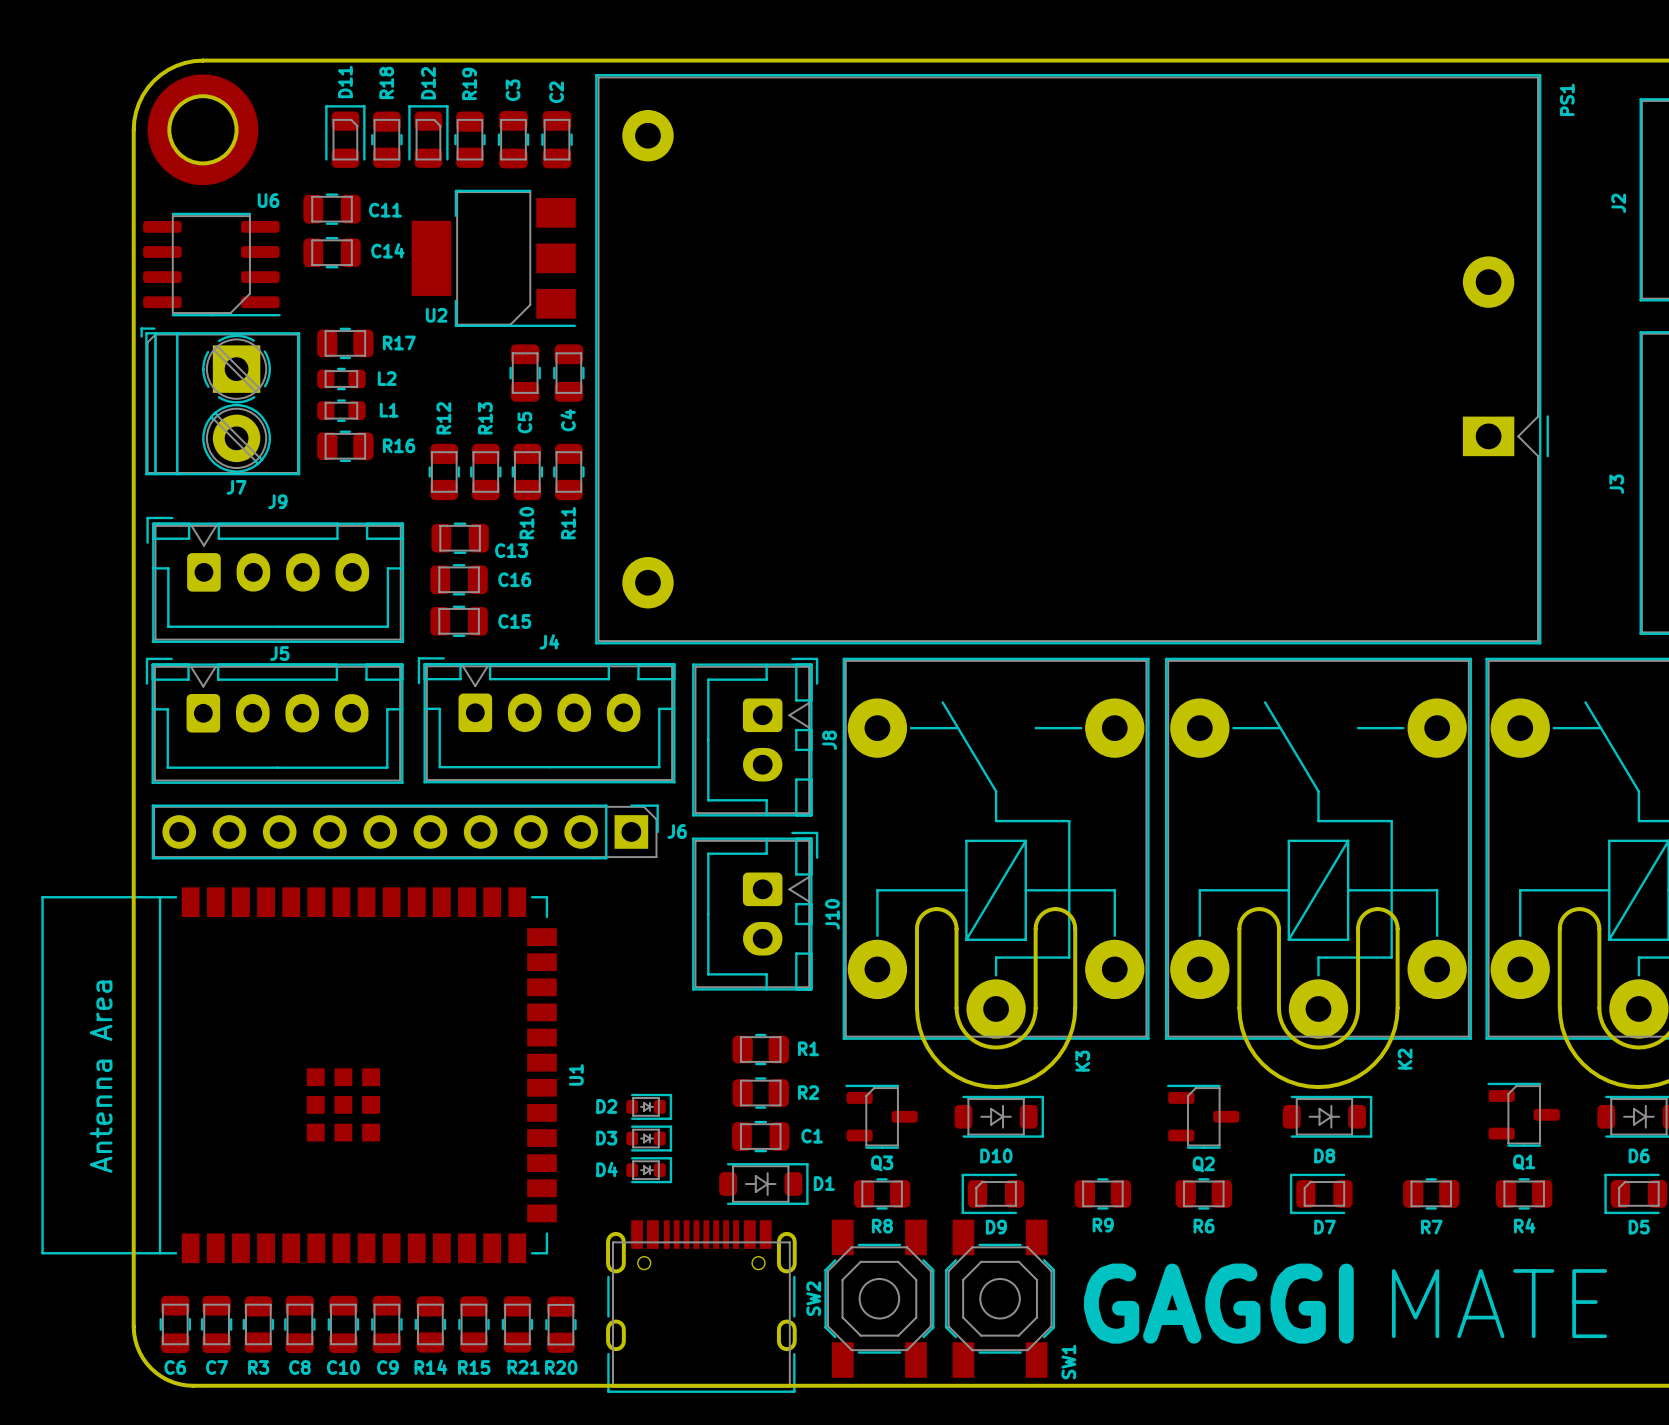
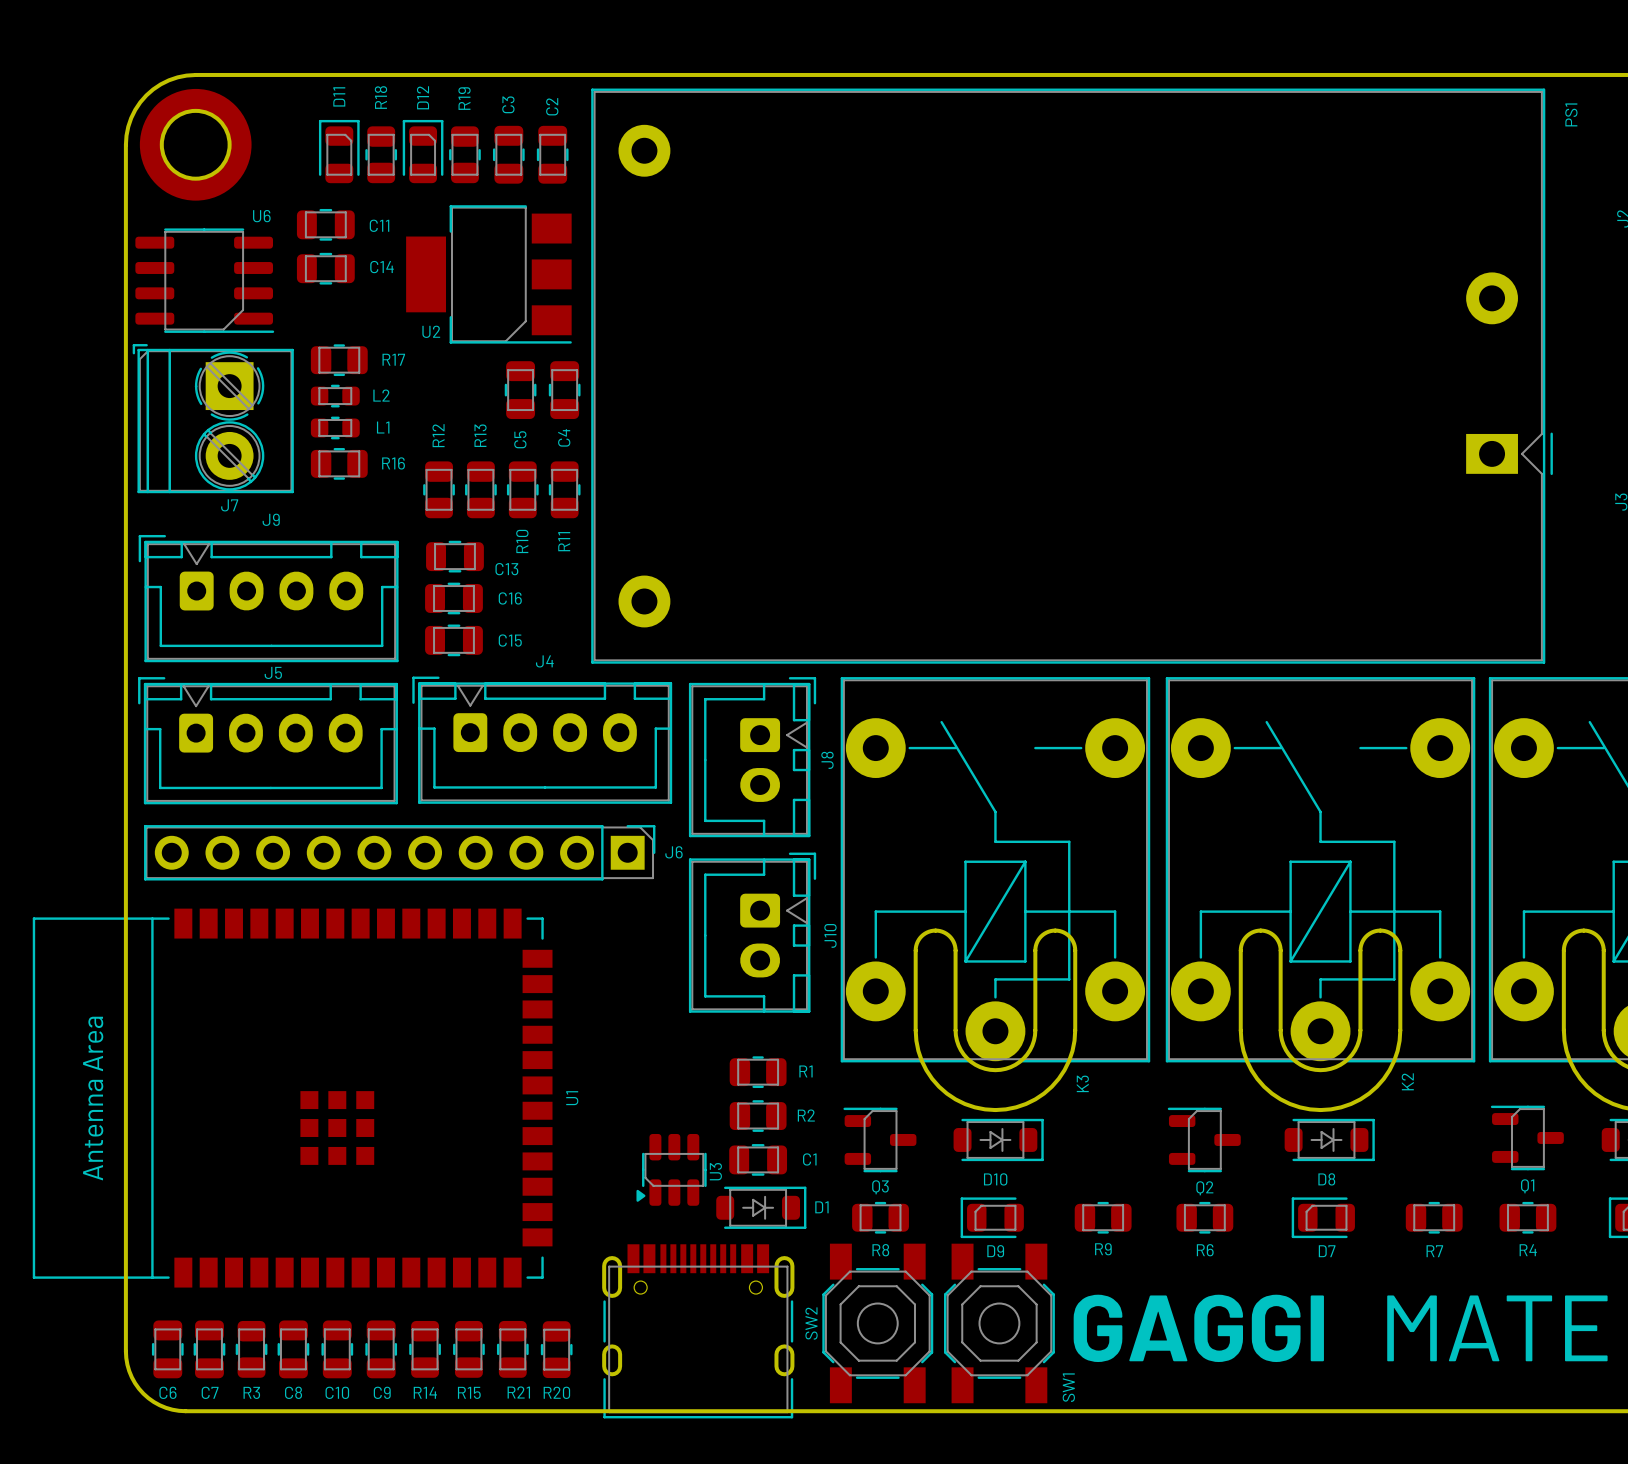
D2: (649, 1106) -> none
D3: (649, 1138) -> none
U3: none -> (671, 1169)
D4: (649, 1170) -> none

